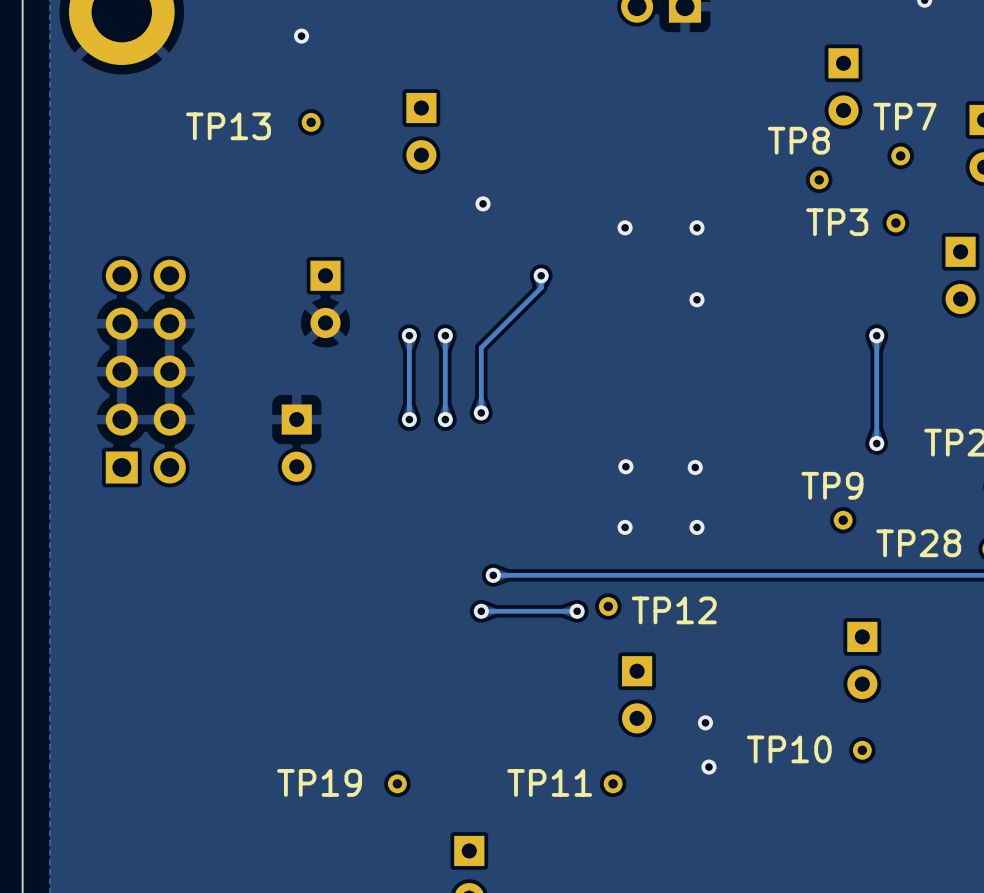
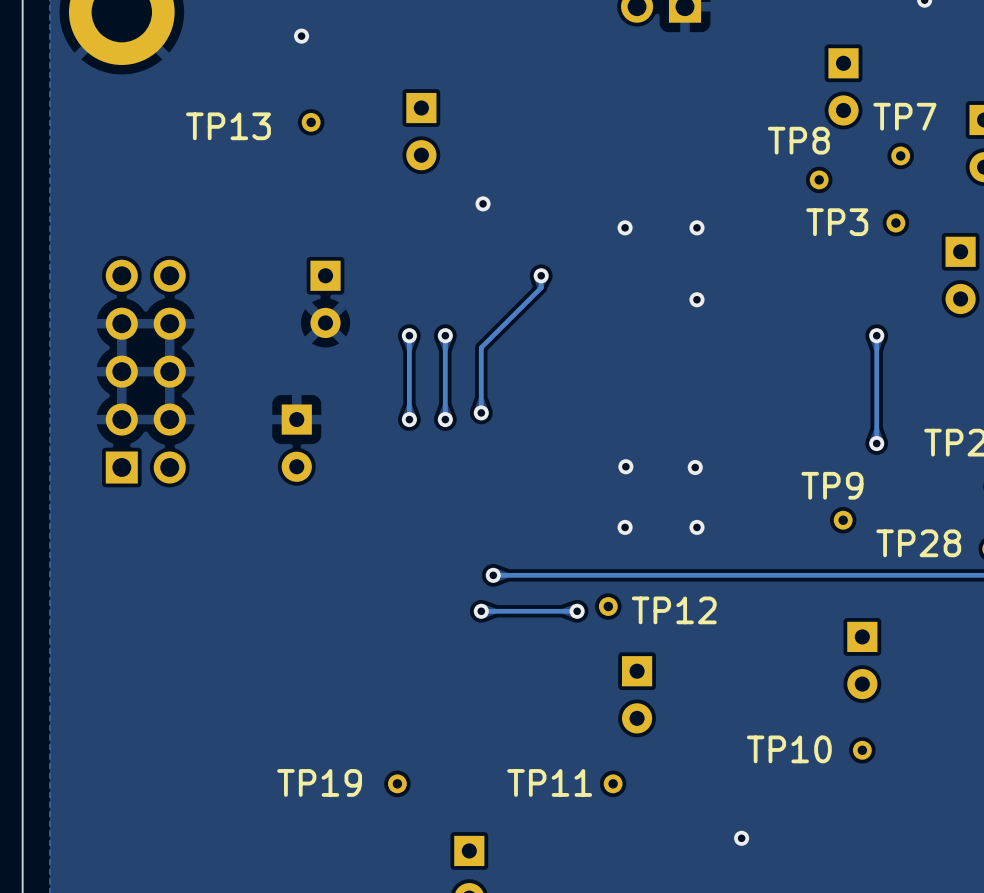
via: (705, 722) -> none
via: (708, 767) -> none
via: none -> (741, 838)

